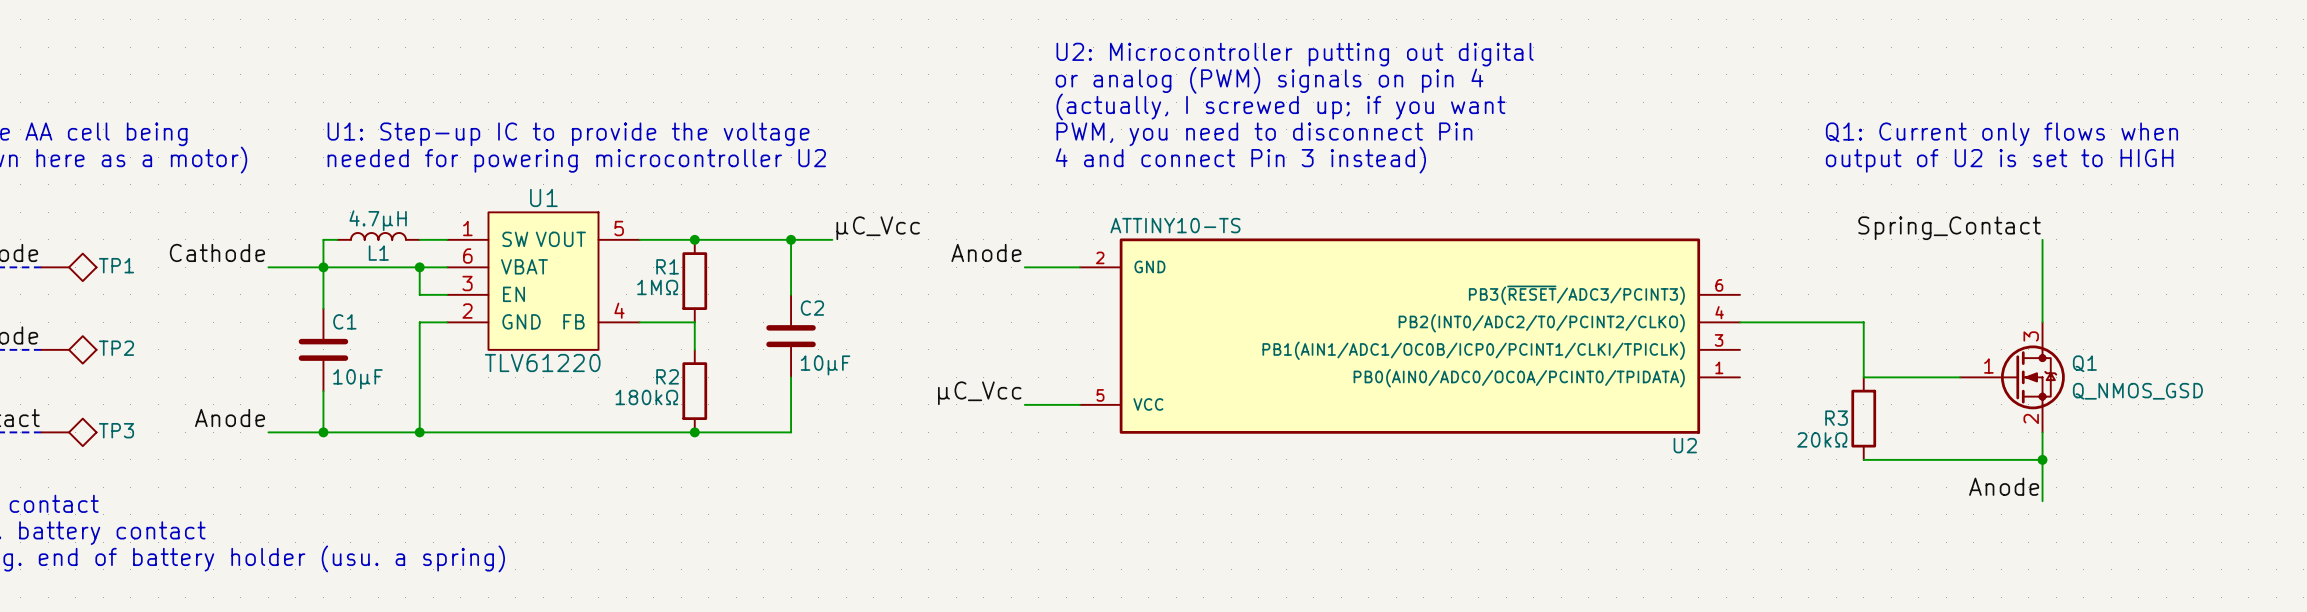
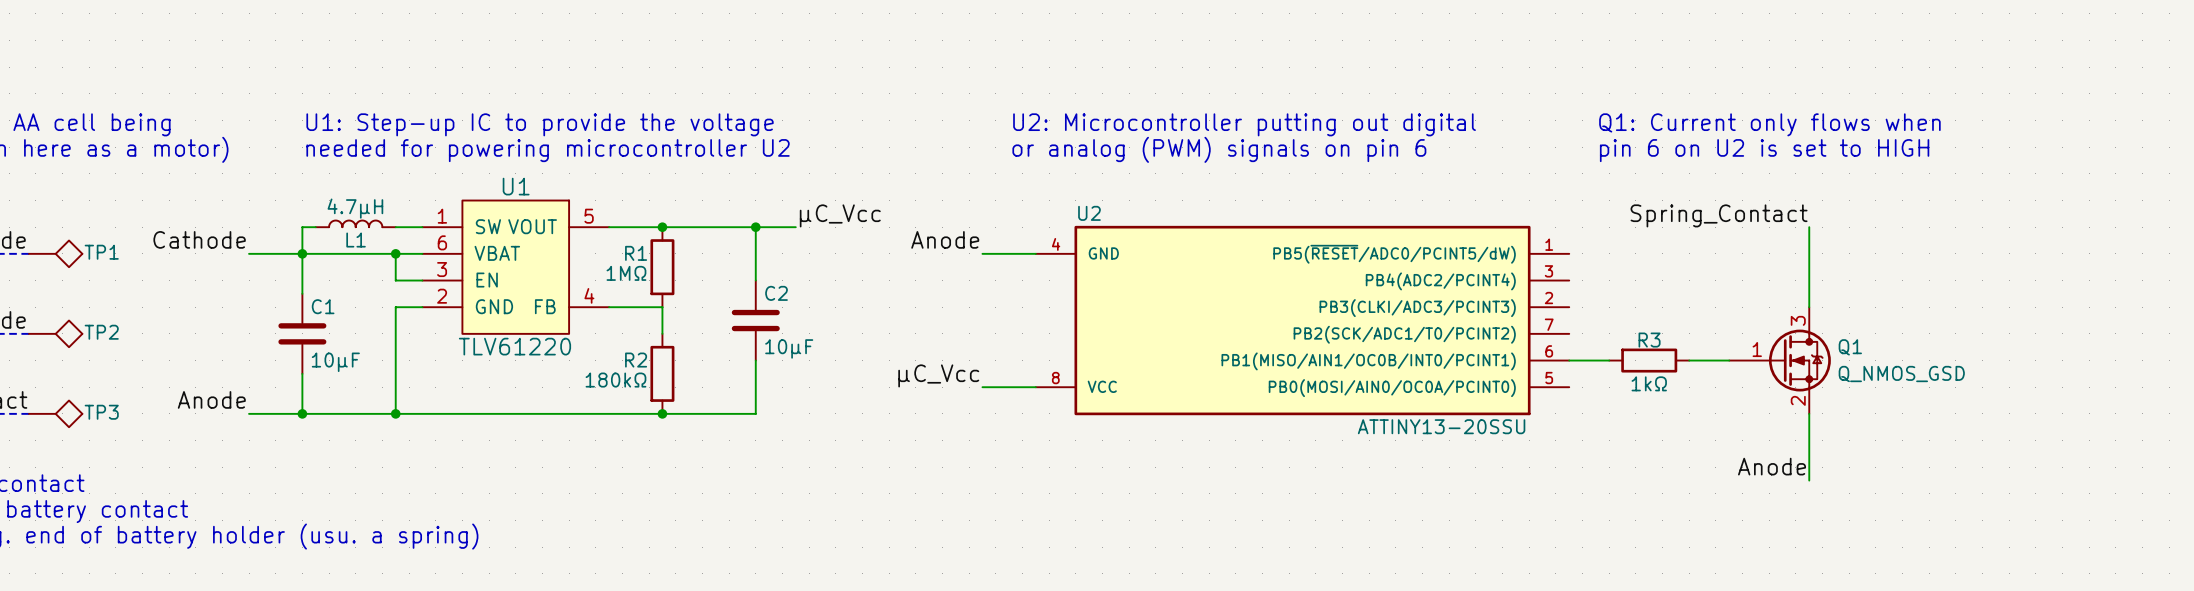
text: U2: Microcontroller putting out digital (1295, 54) -> none
text: or analog (PWM) signals on pin 4 (1269, 80) -> none
text: (actually, I screwed up; if you want (1280, 106) -> none
text: PWM, you need to disconnect Pin (1264, 134) -> U2: Microcontroller putting out digital (1244, 124)
text position: Q1: Current only flows when (2001, 134) -> Q1: Current only flows when (1769, 124)
text: 4 and connect Pin 3 instead) (1240, 160) -> or analog (PWM) signals on pin 6 (1219, 149)
text: output of U2 is set to HIGH (1999, 160) -> pin 6 on U2 is set to HIGH (1764, 150)
U2 value: ATTINY10-TS (1175, 225) -> ATTINY13-20SSU (1441, 426)
label position: Spring_Contact (1949, 228) -> Spring_Contact (1719, 215)
U2 symbol: [1079, 238, 1740, 434] -> [1035, 225, 1570, 416]
wire: (2042, 239) (2042, 322) -> (1809, 227) (1809, 307)
wire: (1739, 322) (1863, 322) (1863, 377) (1960, 377) -> none
wire: none -> (1689, 360) (1729, 360)
Q1 position: (2012, 377) -> (1780, 360)
R3 rotation: 0° (1863, 418) -> 90° clockwise (1649, 360)
R3 position: (1863, 418) -> (1649, 360)
wire: (2042, 432) (2042, 501) -> (1809, 413) (1809, 480)
R3 value: 20kΩ (1822, 439) -> 1kΩ (1649, 383)
U2 name position: U2 (1685, 445) -> U2 (1089, 213)
wire: (1863, 459) (2042, 459) -> none
junction: (2042, 459) -> none
label position: Anode (2004, 486) -> Anode (1772, 466)

